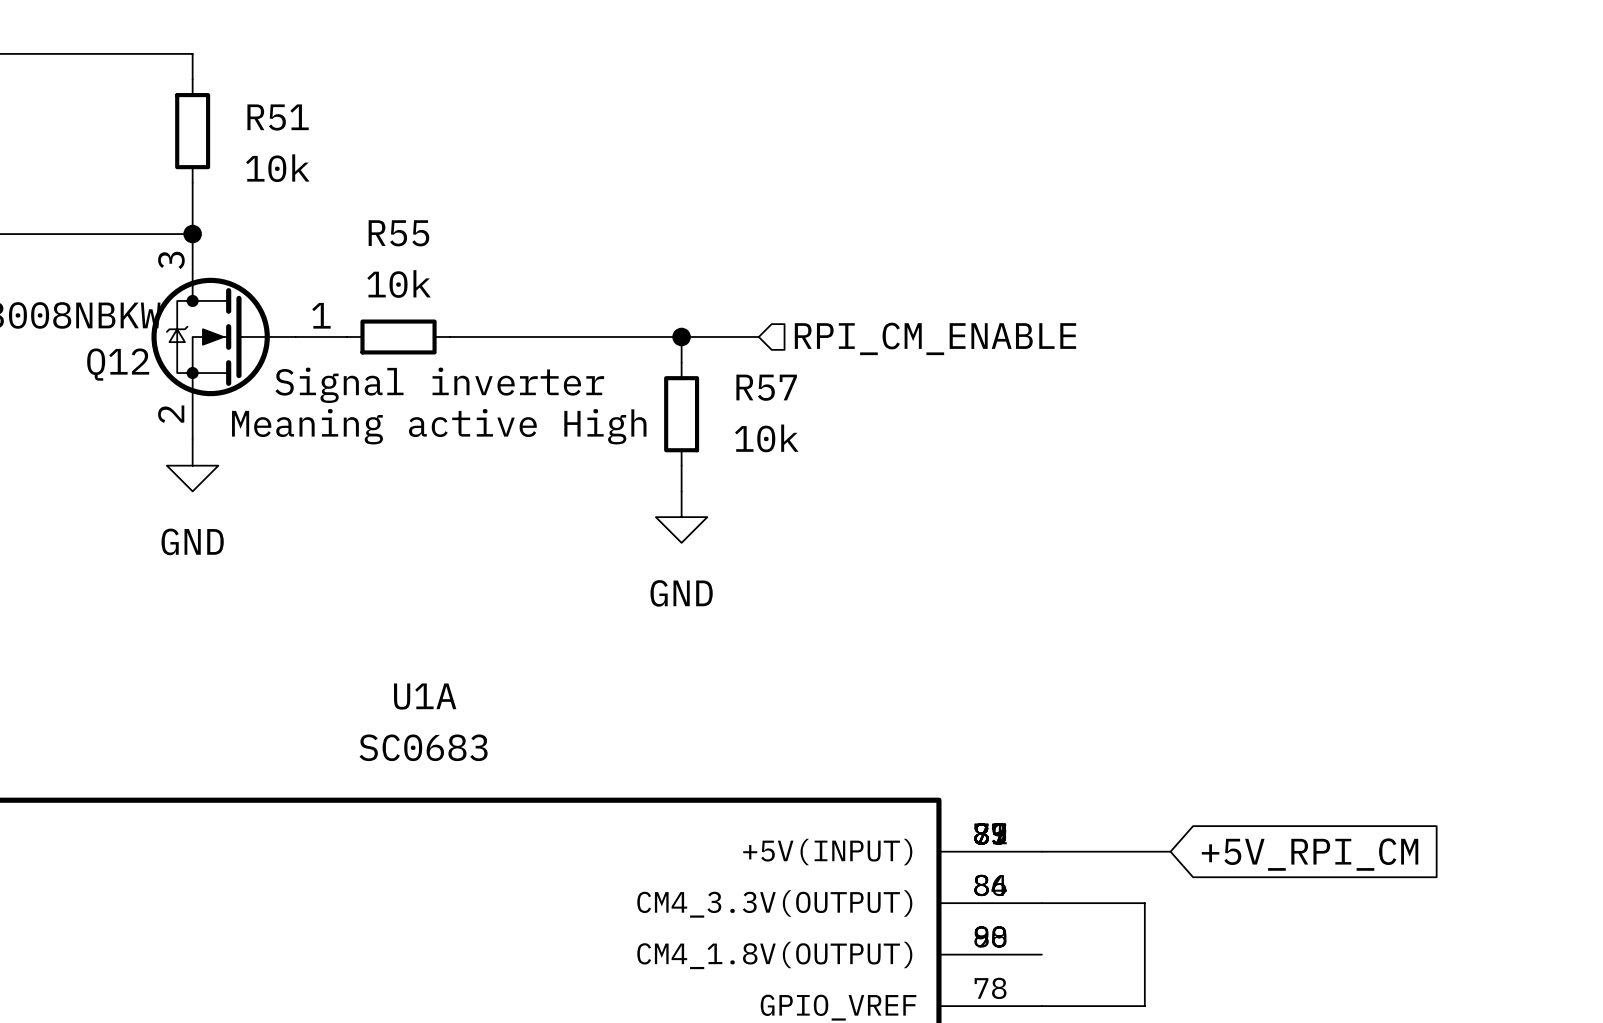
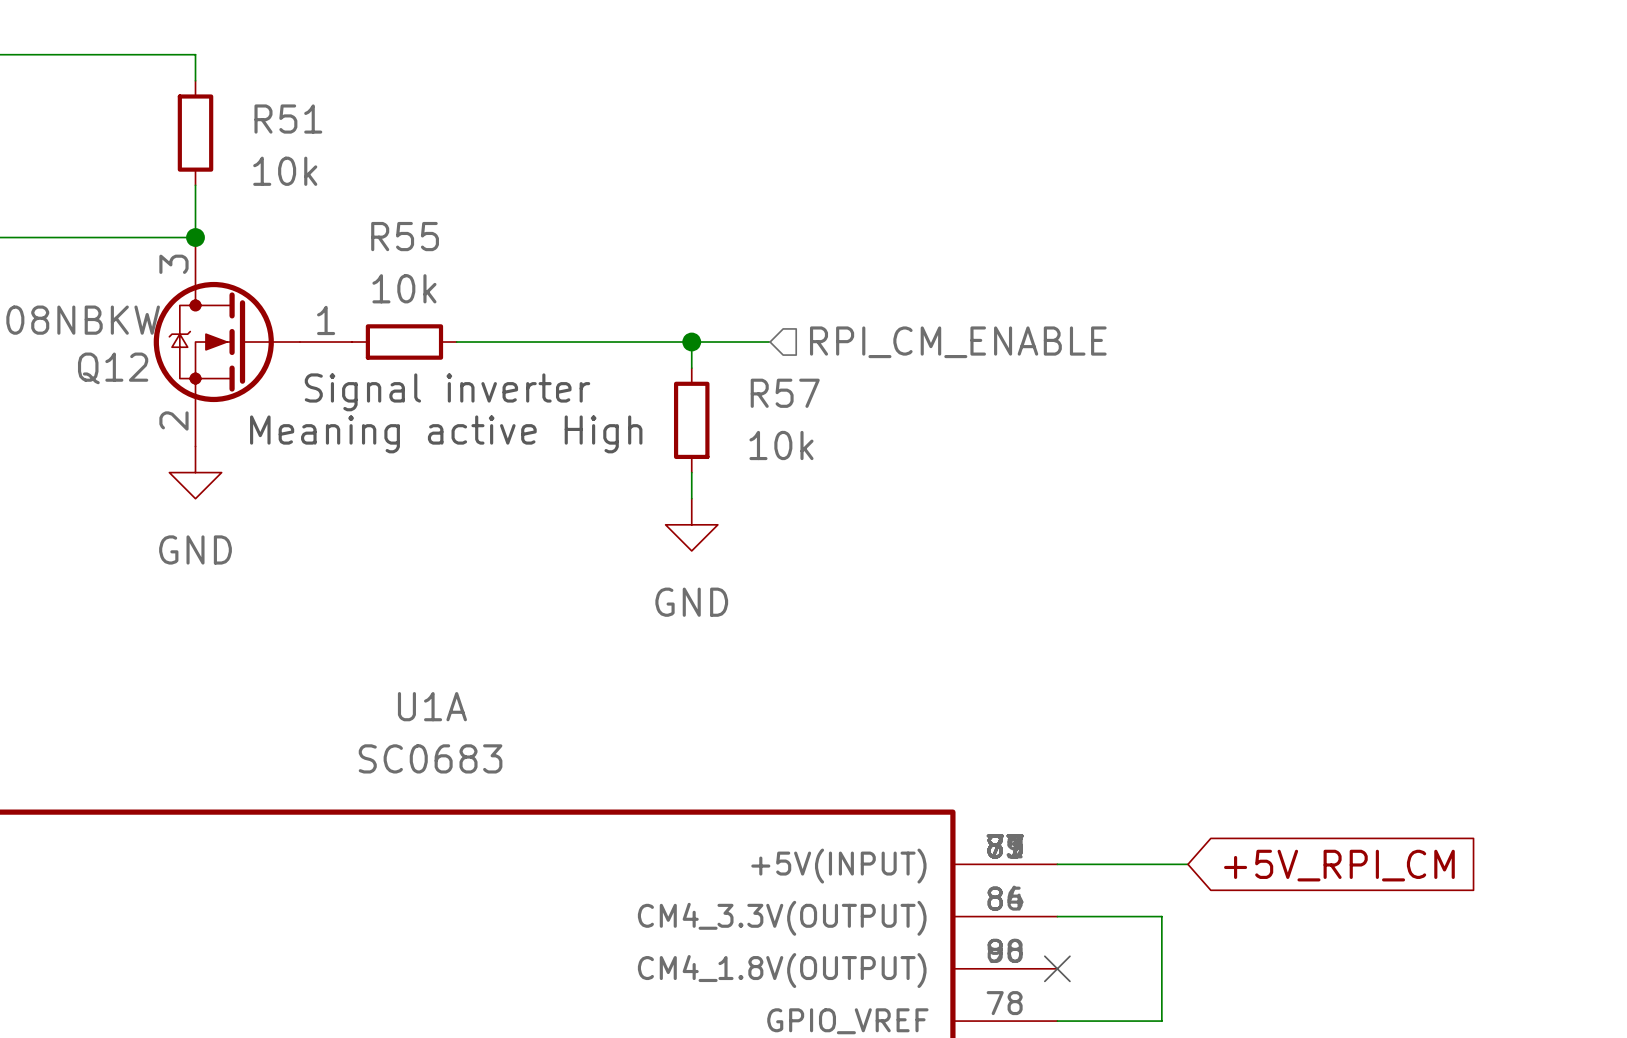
no-connect mark: none -> (1057, 968)

